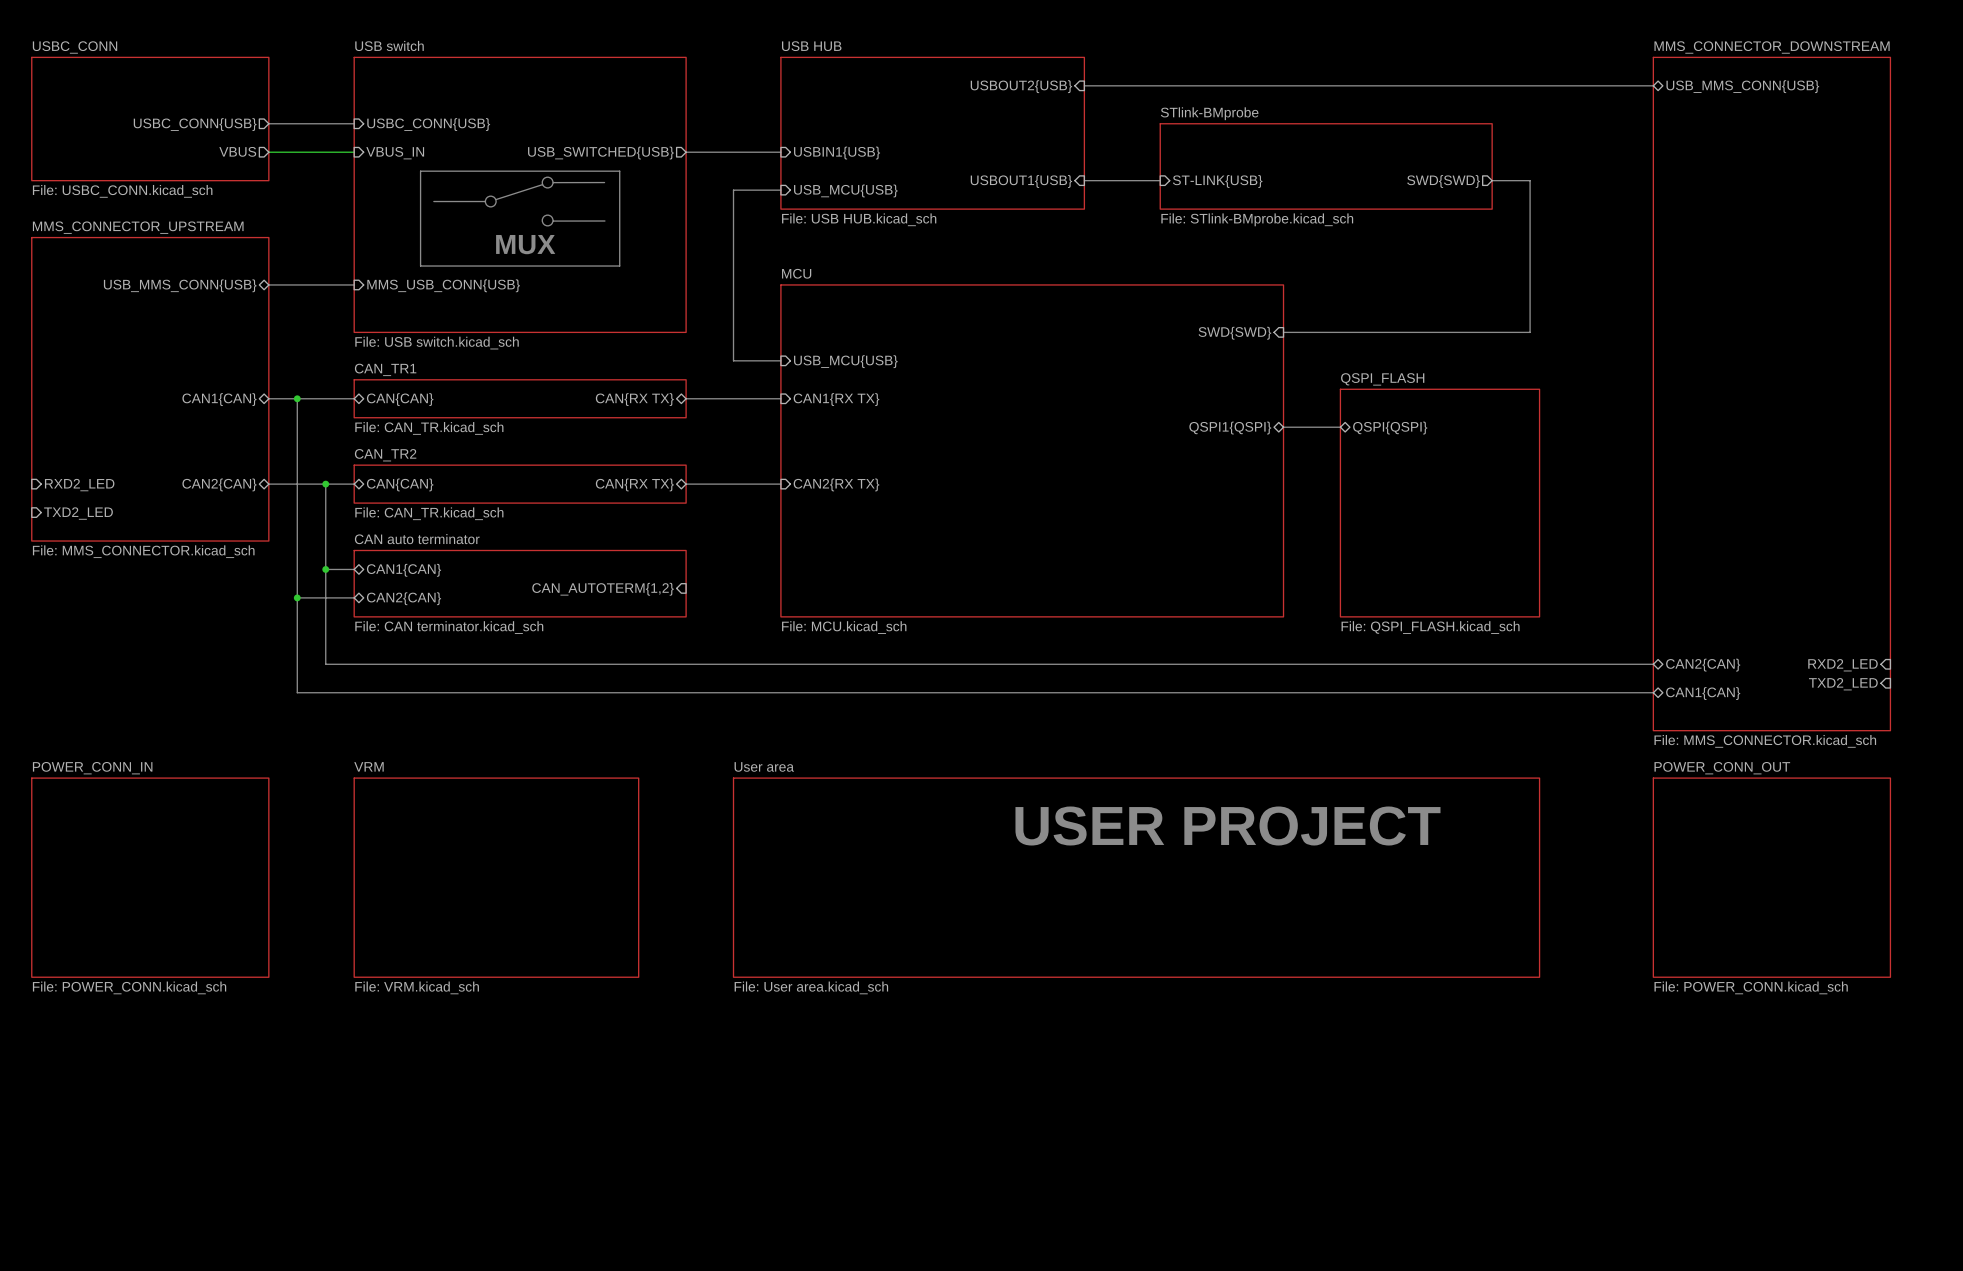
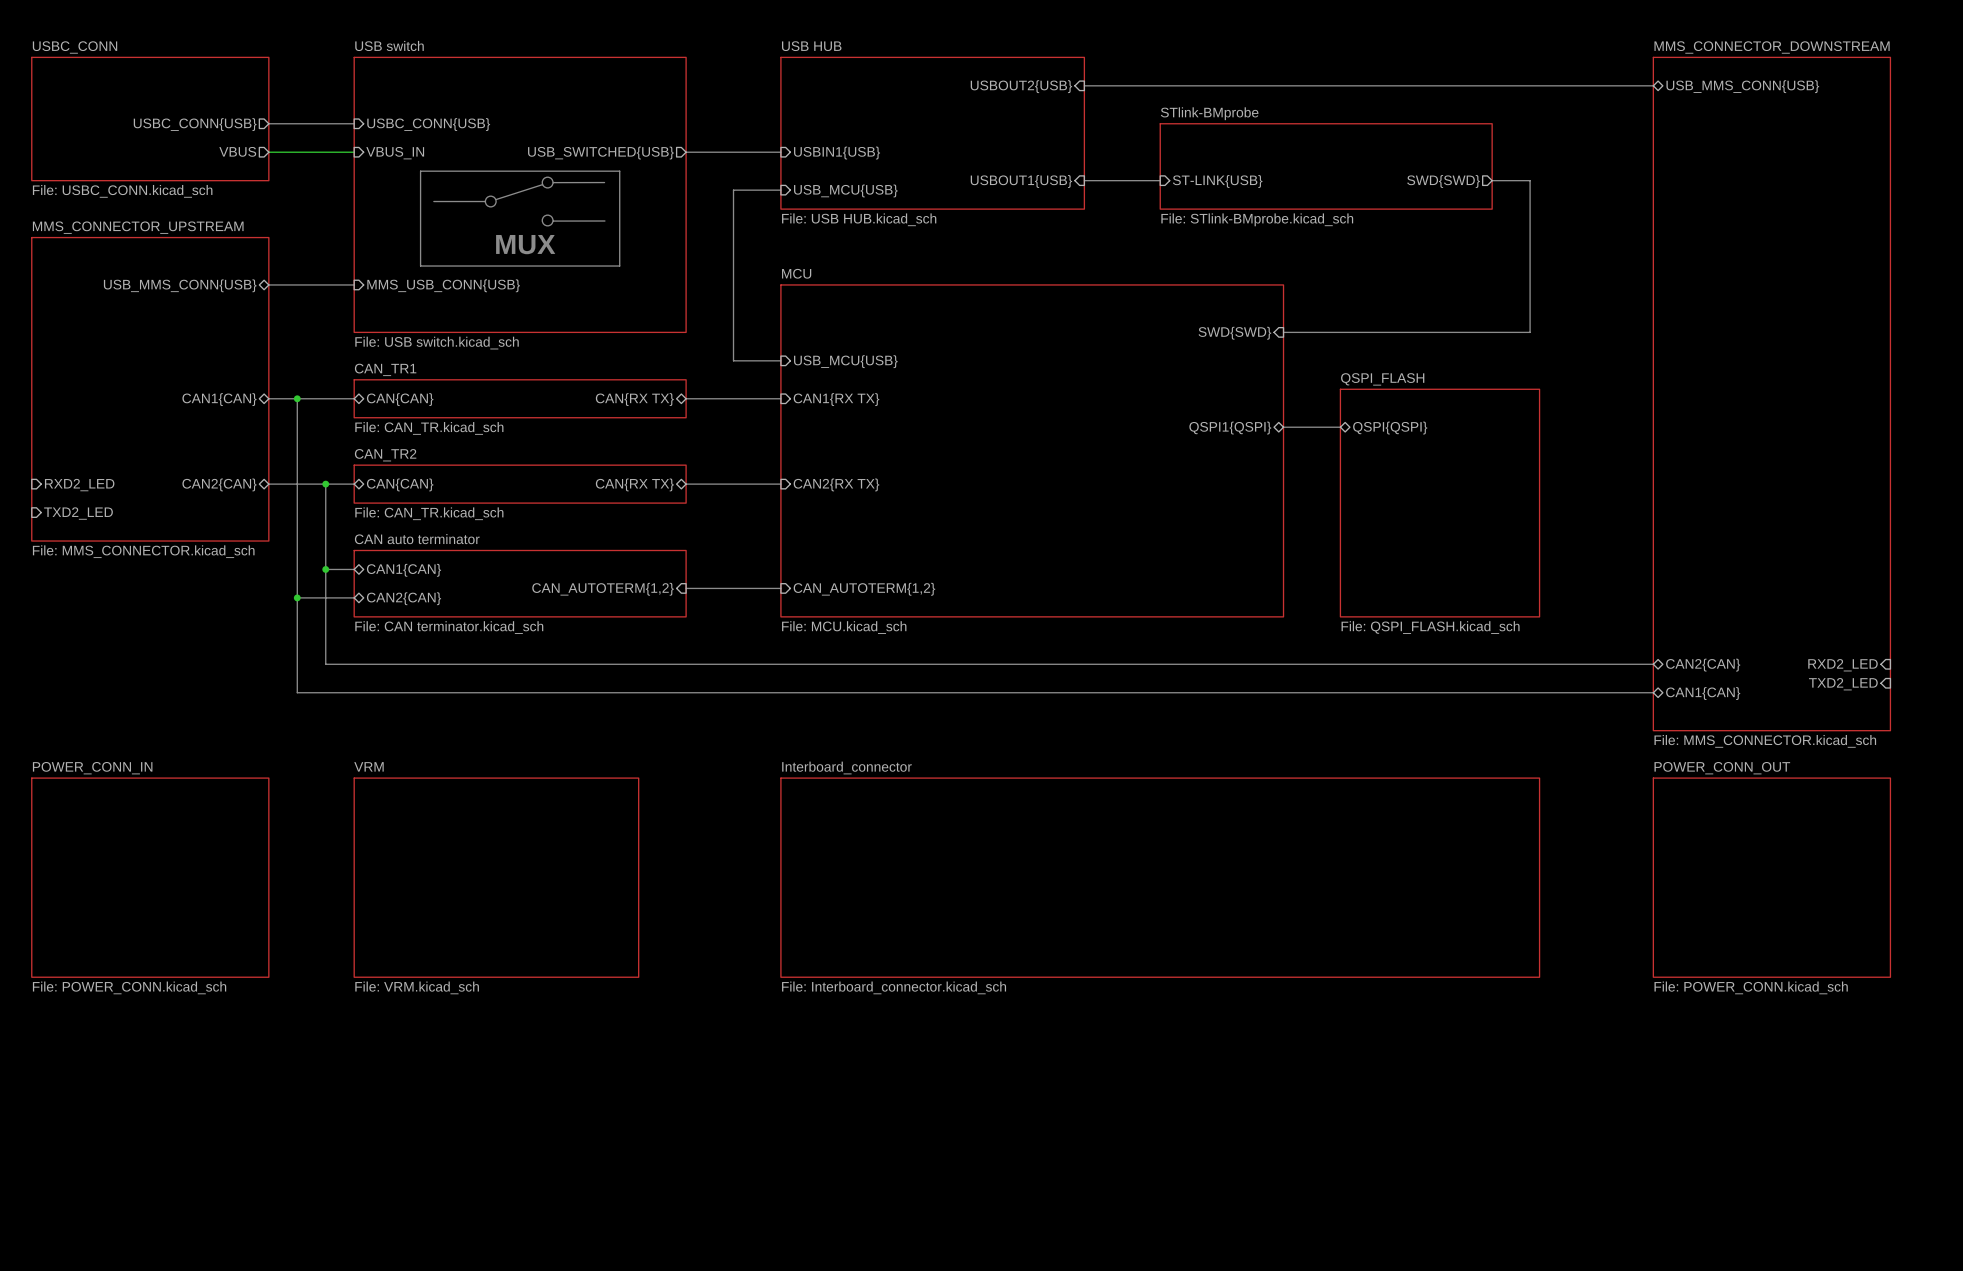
bus: none -> (686, 588) (780, 588)
sheet pin: none -> CAN_AUTOTERM{1,2} (864, 589)
text: USER PROJECT (1227, 826) -> none
sheet User area: File: User area.kicad_sch (1136, 877) -> none
sheet Interboard_connector: none -> File: Interboard_connector.kicad_sch (1160, 877)

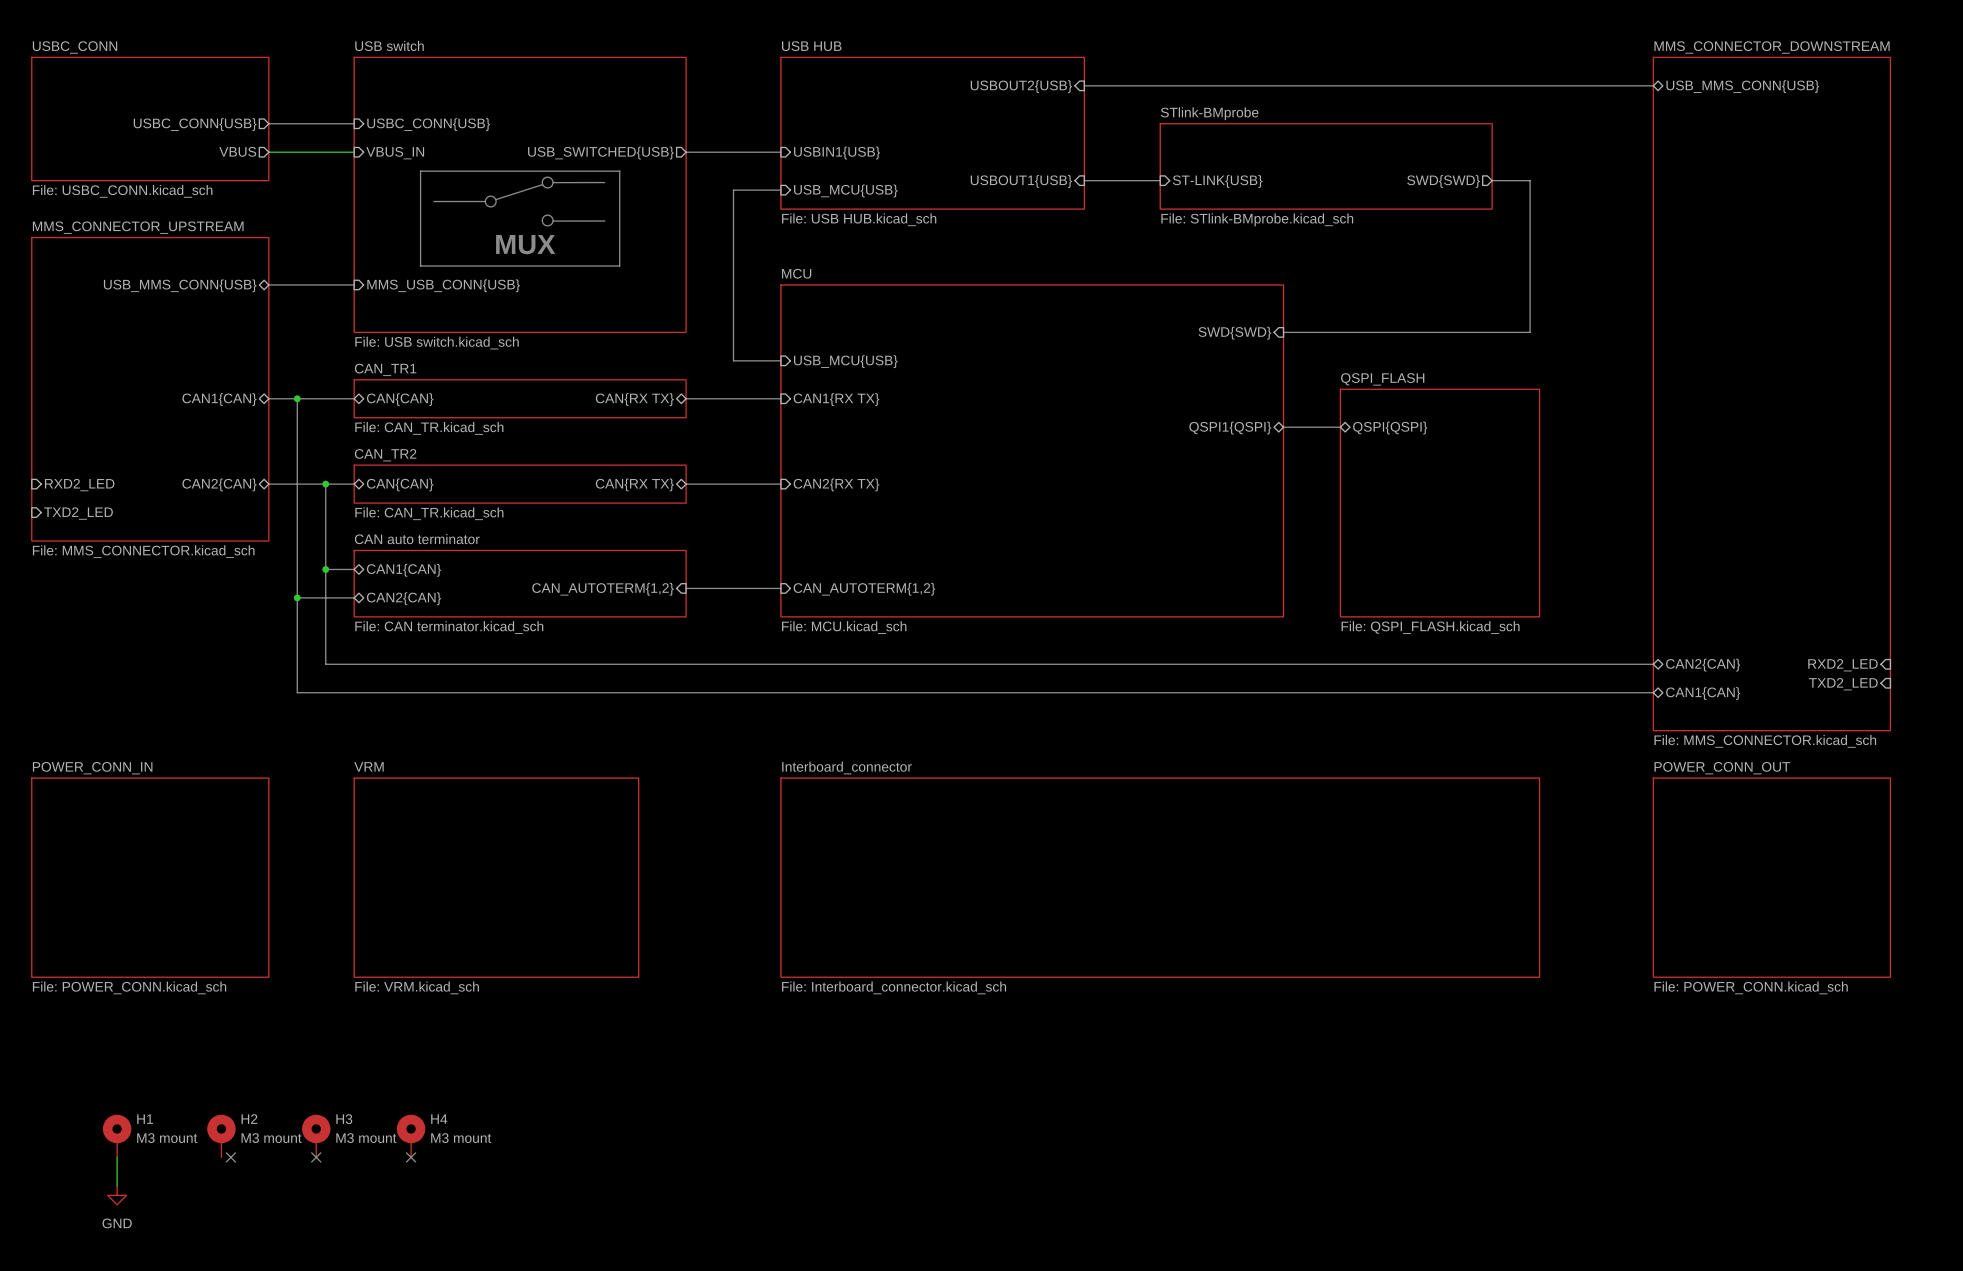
H1: none -> M3 mount (117, 1136)
H2: none -> M3 mount (221, 1136)
H3: none -> M3 mount (316, 1136)
H4: none -> M3 mount (411, 1136)
wire: none -> (117, 1157) (117, 1185)
no-connect mark: none -> (230, 1157)
no-connect mark: none -> (316, 1157)
no-connect mark: none -> (411, 1157)
power symbol: none -> GND (117, 1195)

